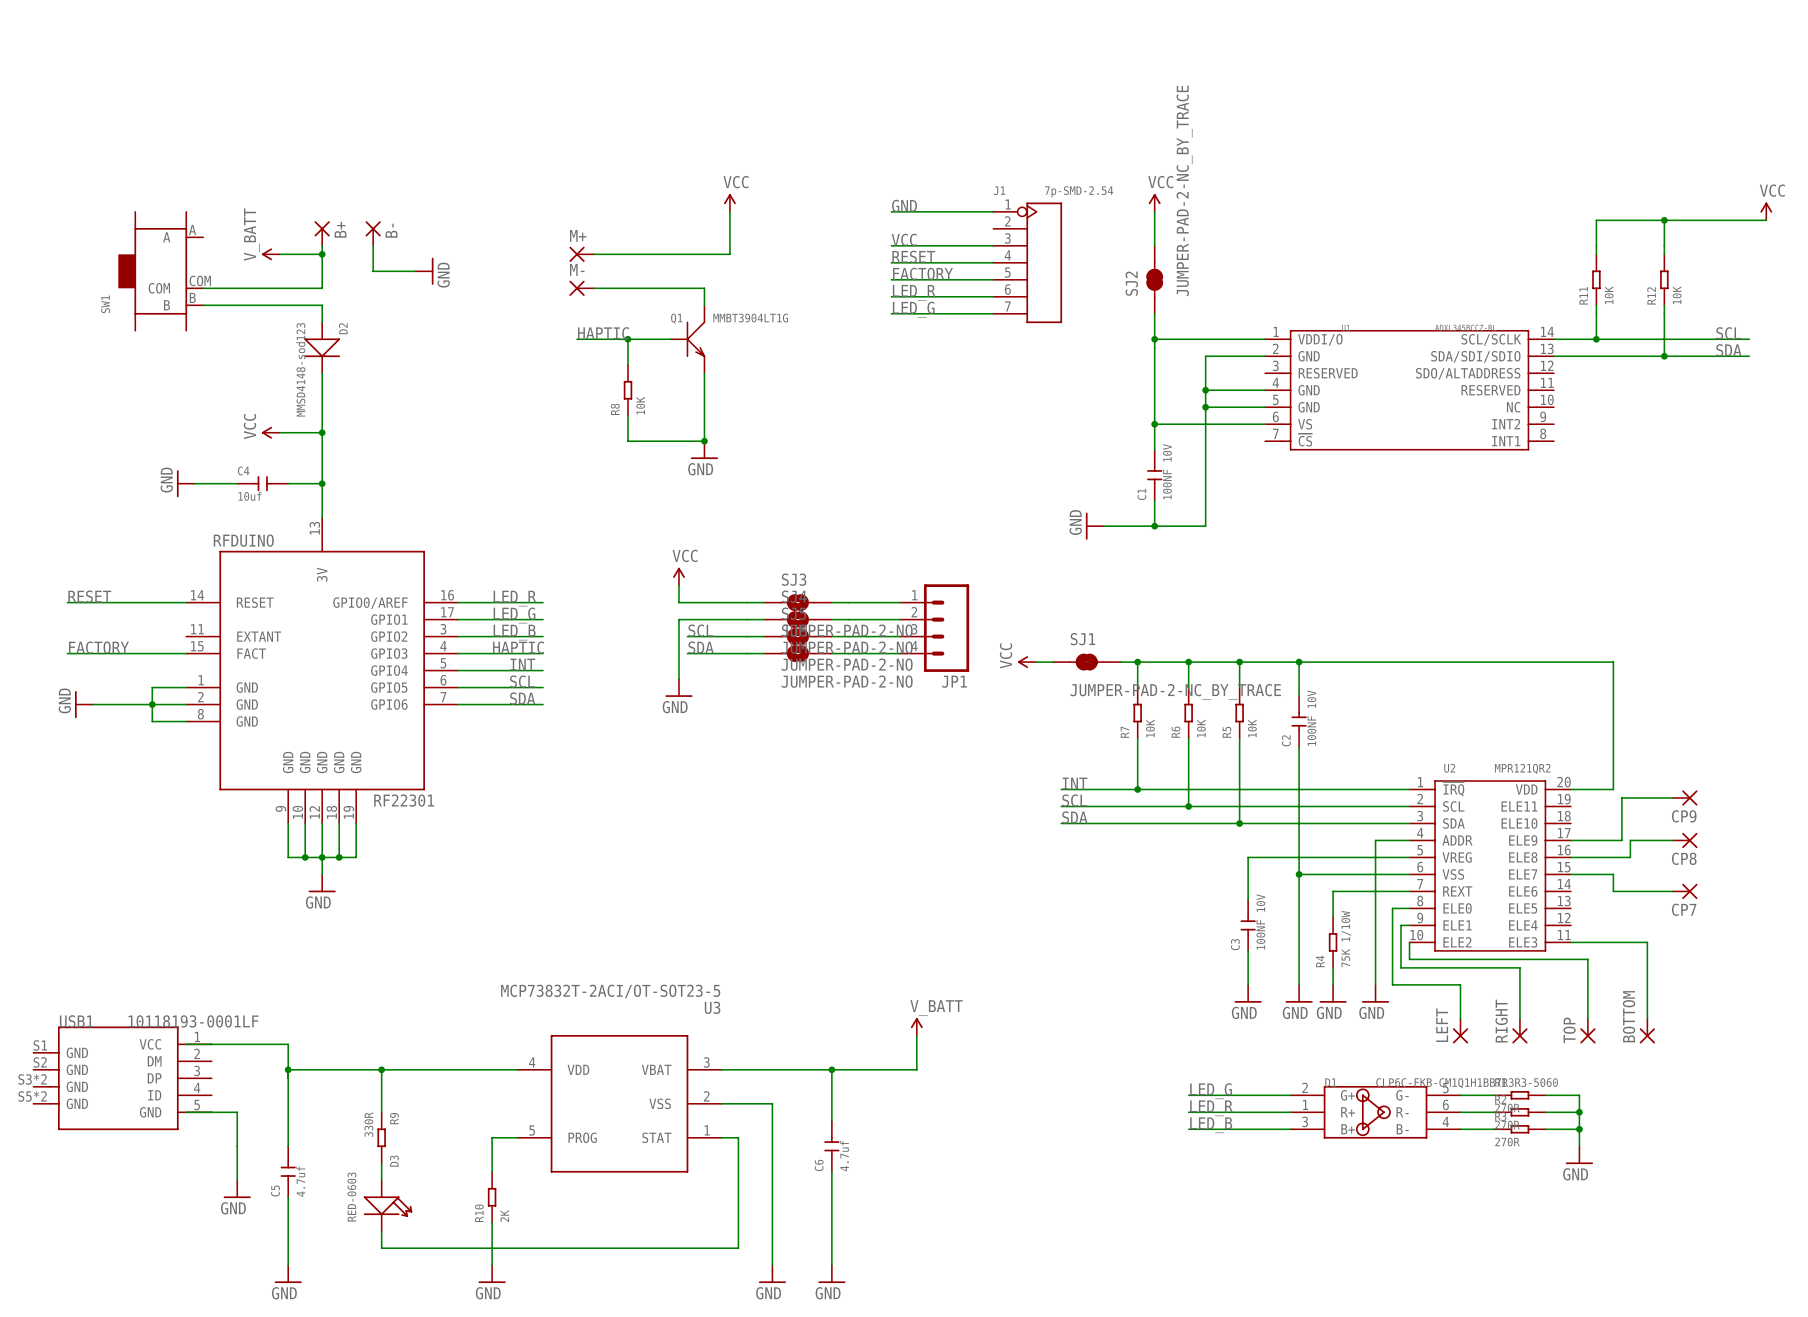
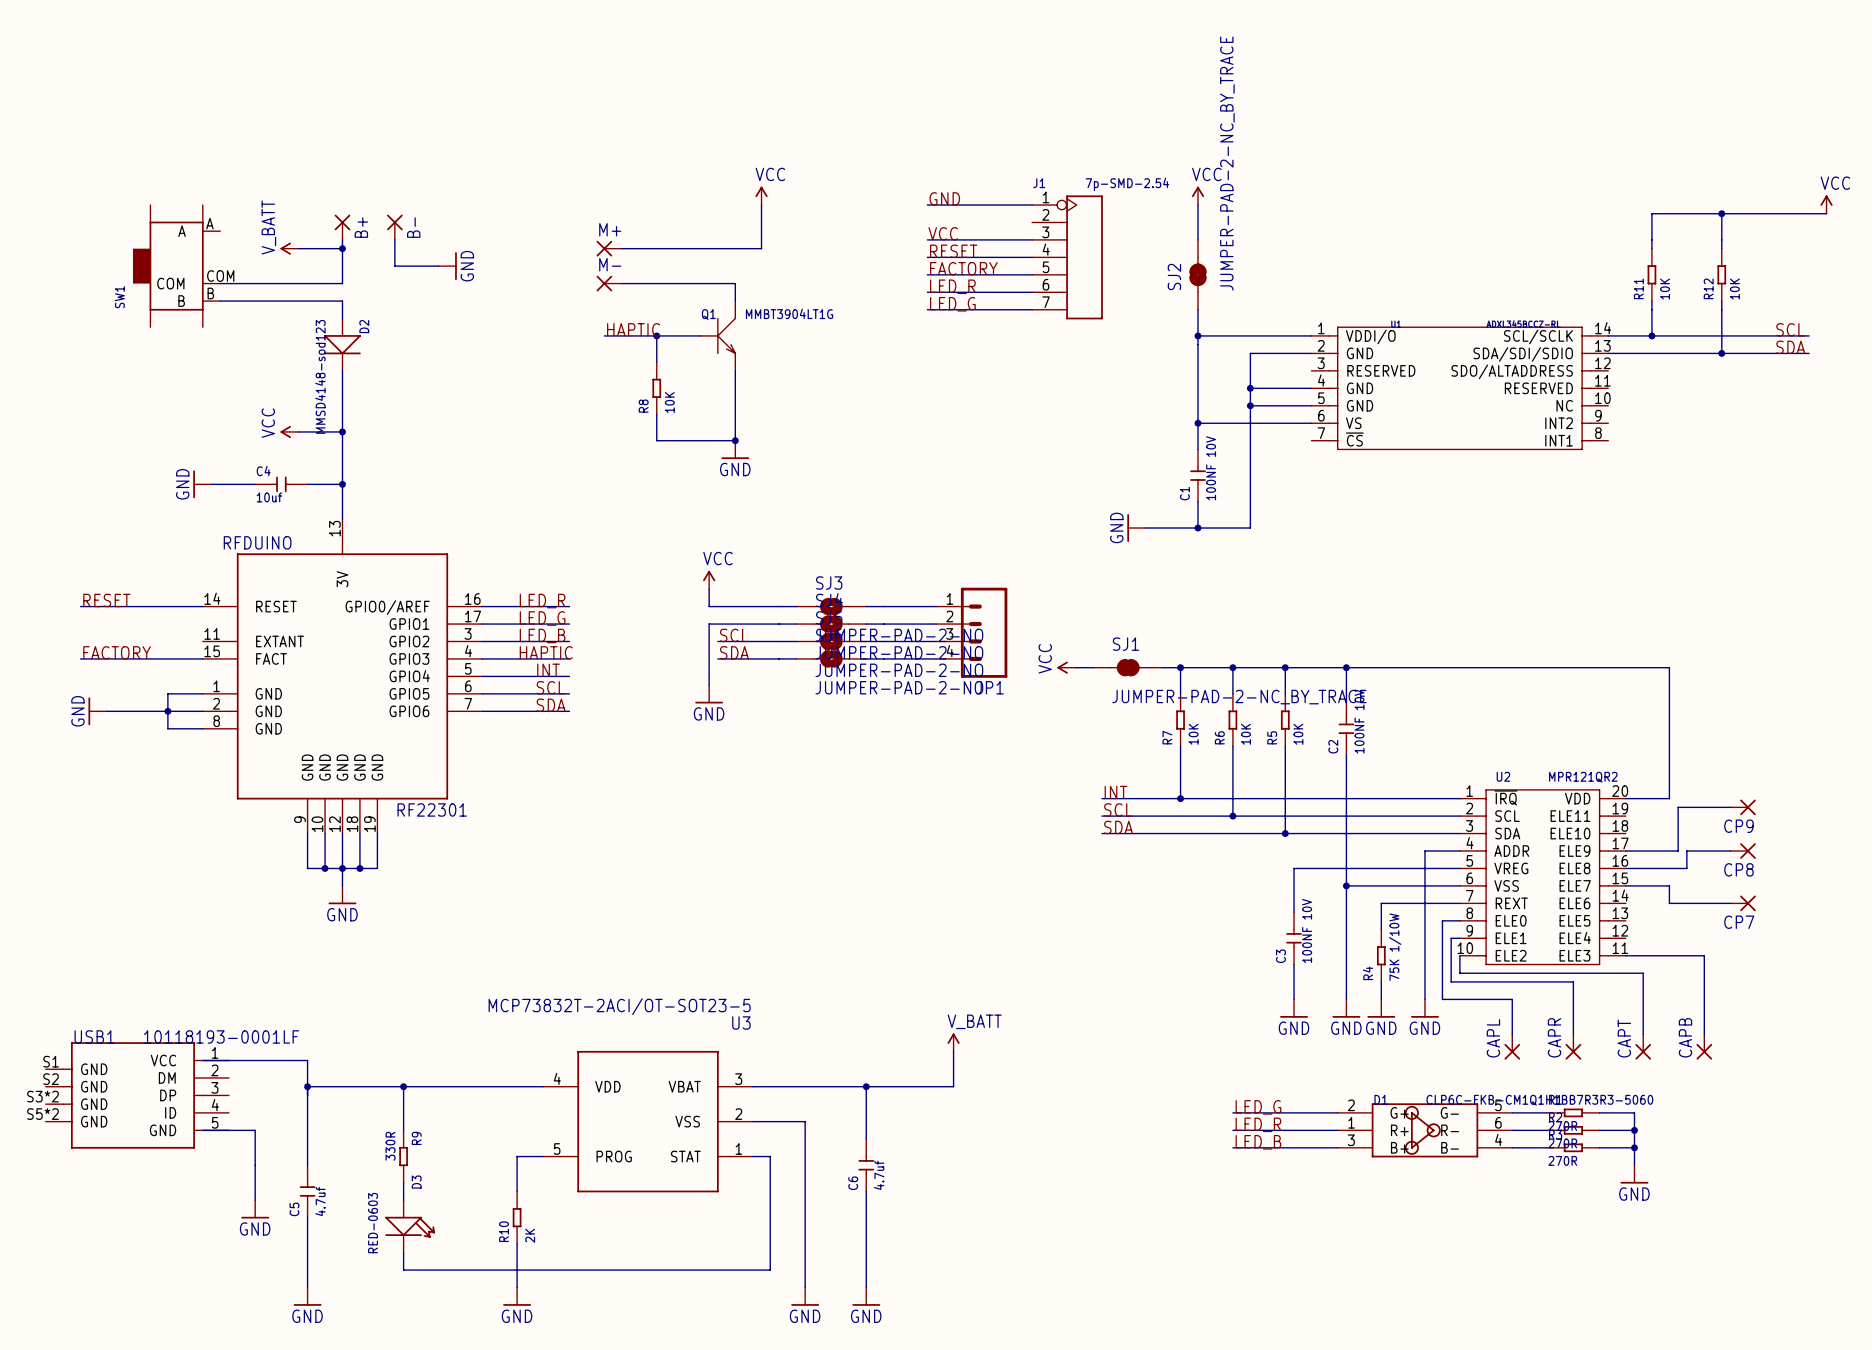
BOTTOM name: BOTTOM (1629, 1016) -> CAPB (1685, 1037)
RIGHT name: RIGHT (1501, 1021) -> CAPR (1554, 1037)
LEFT name: LEFT (1442, 1025) -> CAPL (1493, 1038)
TOP name: TOP (1569, 1030) -> CAPT (1624, 1038)

